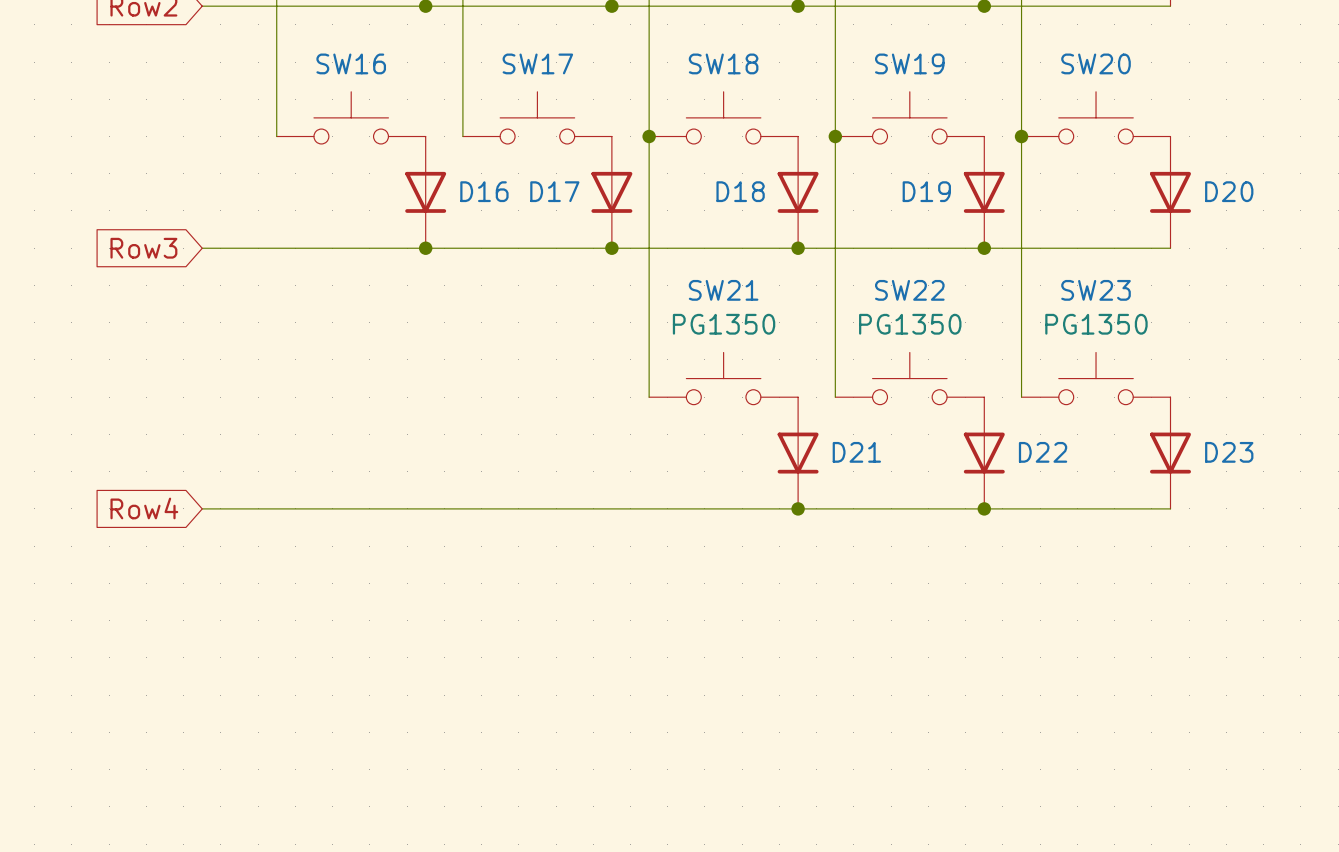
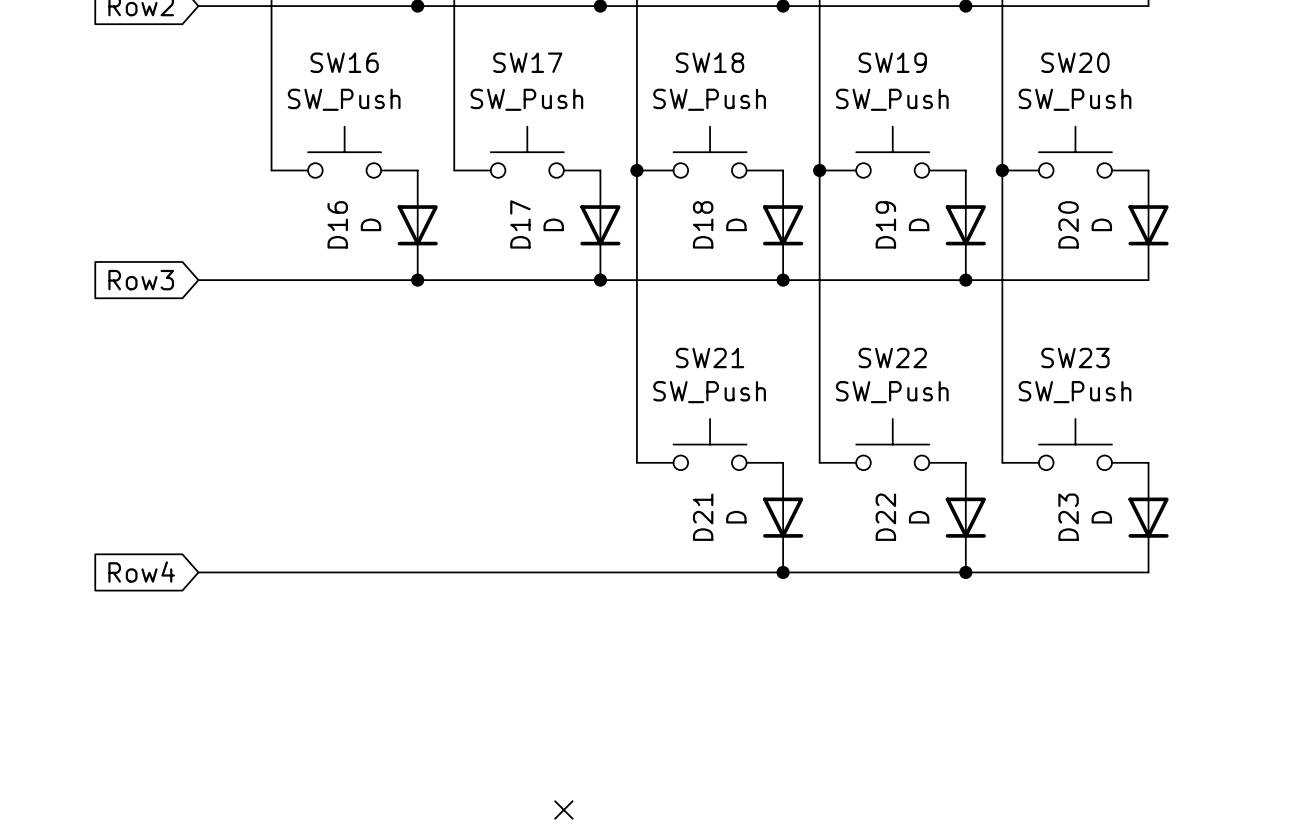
SW16 value: none -> SW_Push (344, 99)
SW17 value: none -> SW_Push (526, 99)
SW18 value: none -> SW_Push (709, 99)
SW19 value: none -> SW_Push (892, 99)
SW20 value: none -> SW_Push (1075, 99)
SW16 position: (351, 117) -> (344, 152)
SW17 position: (537, 117) -> (527, 152)
SW18 position: (723, 117) -> (710, 152)
SW19 position: (909, 117) -> (892, 152)
SW20 position: (1096, 117) -> (1075, 152)
wire: none -> (271, 133) (271, 170)
wire: none -> (454, 133) (454, 170)
junction position: (649, 136) -> (636, 170)
junction position: (835, 136) -> (819, 170)
junction position: (1021, 136) -> (1002, 170)
D16 name rotation: 0° (484, 191) -> 90° counterclockwise (337, 224)
D16 name position: D16 (484, 191) -> D16 (337, 224)
D17 name rotation: 0° (554, 191) -> 90° counterclockwise (520, 224)
D18 name rotation: 0° (740, 191) -> 90° counterclockwise (703, 224)
D19 name rotation: 0° (926, 191) -> 90° counterclockwise (885, 224)
D20 name rotation: 0° (1229, 191) -> 90° counterclockwise (1068, 224)
D20 name position: D20 (1229, 191) -> D20 (1068, 224)
D16 position: (425, 192) -> (417, 225)
D17 position: (611, 192) -> (600, 225)
D18 position: (798, 192) -> (783, 225)
D19 position: (984, 192) -> (965, 225)
D20 position: (1170, 192) -> (1148, 225)
D16 value: none -> D (370, 224)
D17 value: none -> D (553, 224)
D18 value: none -> D (736, 224)
D19 value: none -> D (919, 224)
D20 value: none -> D (1101, 224)
global label position: Row3 (143, 248) -> Row3 (141, 280)
wire: (202, 248) (1170, 248) -> (198, 280) (1148, 280)
junction position: (425, 248) -> (417, 280)
junction position: (611, 248) -> (600, 280)
junction position: (798, 248) -> (783, 280)
junction position: (984, 248) -> (965, 280)
SW21 value: PG1350 (724, 324) -> SW_Push (709, 392)
SW22 value: PG1350 (910, 324) -> SW_Push (892, 392)
SW23 value: PG1350 (1096, 324) -> SW_Push (1075, 392)
SW21 position: (723, 378) -> (710, 444)
SW22 position: (909, 378) -> (892, 444)
SW23 position: (1096, 378) -> (1075, 444)
wire: none -> (636, 389) (636, 462)
wire: none -> (819, 389) (819, 462)
wire: none -> (1002, 389) (1002, 462)
D21 name rotation: 0° (856, 452) -> 90° counterclockwise (703, 517)
D21 name position: D21 (856, 452) -> D21 (703, 517)
D22 name rotation: 0° (1043, 452) -> 90° counterclockwise (885, 517)
D22 name position: D22 (1043, 452) -> D22 (885, 517)
D23 name rotation: 0° (1229, 452) -> 90° counterclockwise (1068, 517)
D23 name position: D23 (1229, 452) -> D23 (1068, 517)
D21 position: (798, 453) -> (783, 517)
D22 position: (984, 453) -> (965, 517)
D23 position: (1170, 453) -> (1148, 517)
global label position: Row4 (144, 508) -> Row4 (141, 572)
wire: (202, 508) (1170, 508) -> (198, 572) (1148, 572)
junction position: (798, 508) -> (783, 572)
junction position: (984, 508) -> (965, 572)
D21 value: none -> D (736, 517)
D22 value: none -> D (919, 517)
D23 value: none -> D (1101, 517)
no-connect mark: none -> (563, 809)

